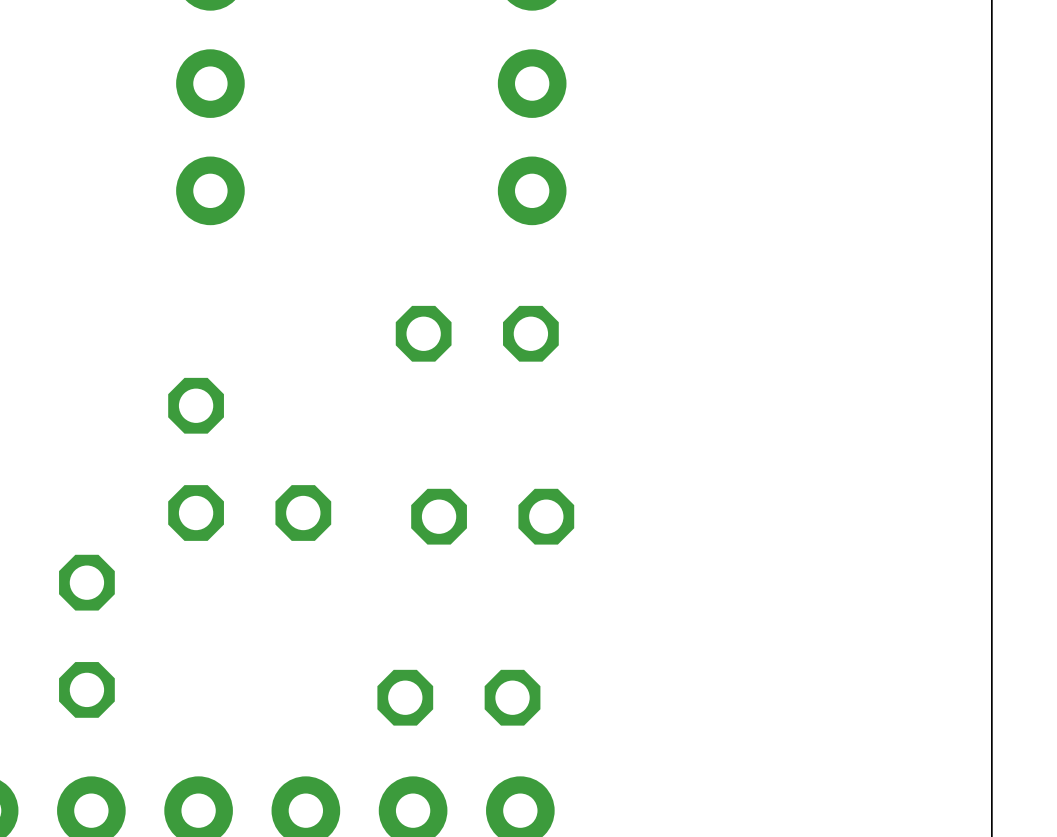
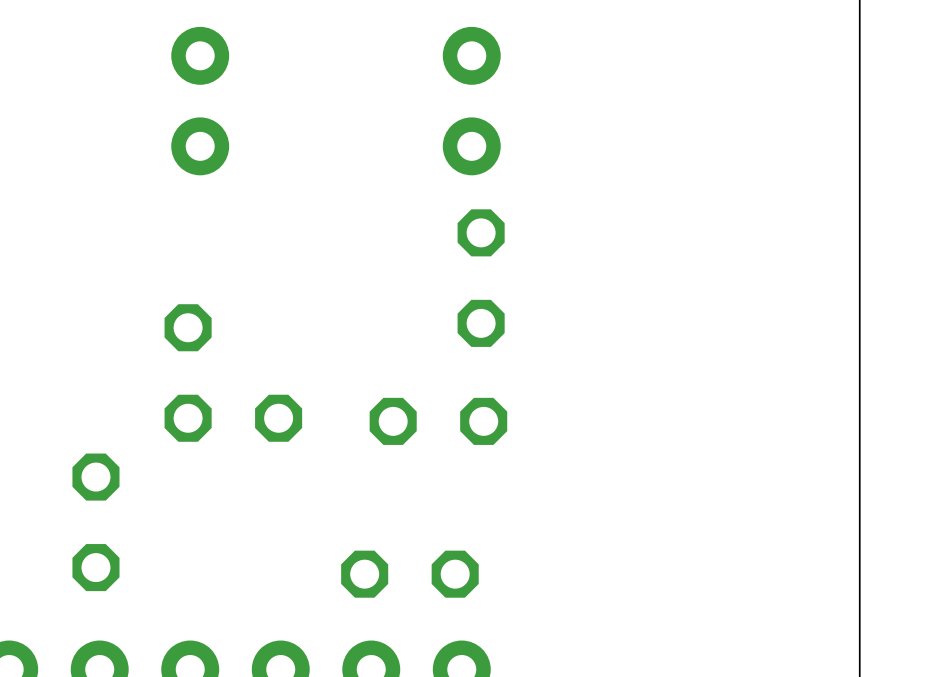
part rotation: 0° (477, 333) -> 90° clockwise (481, 278)

